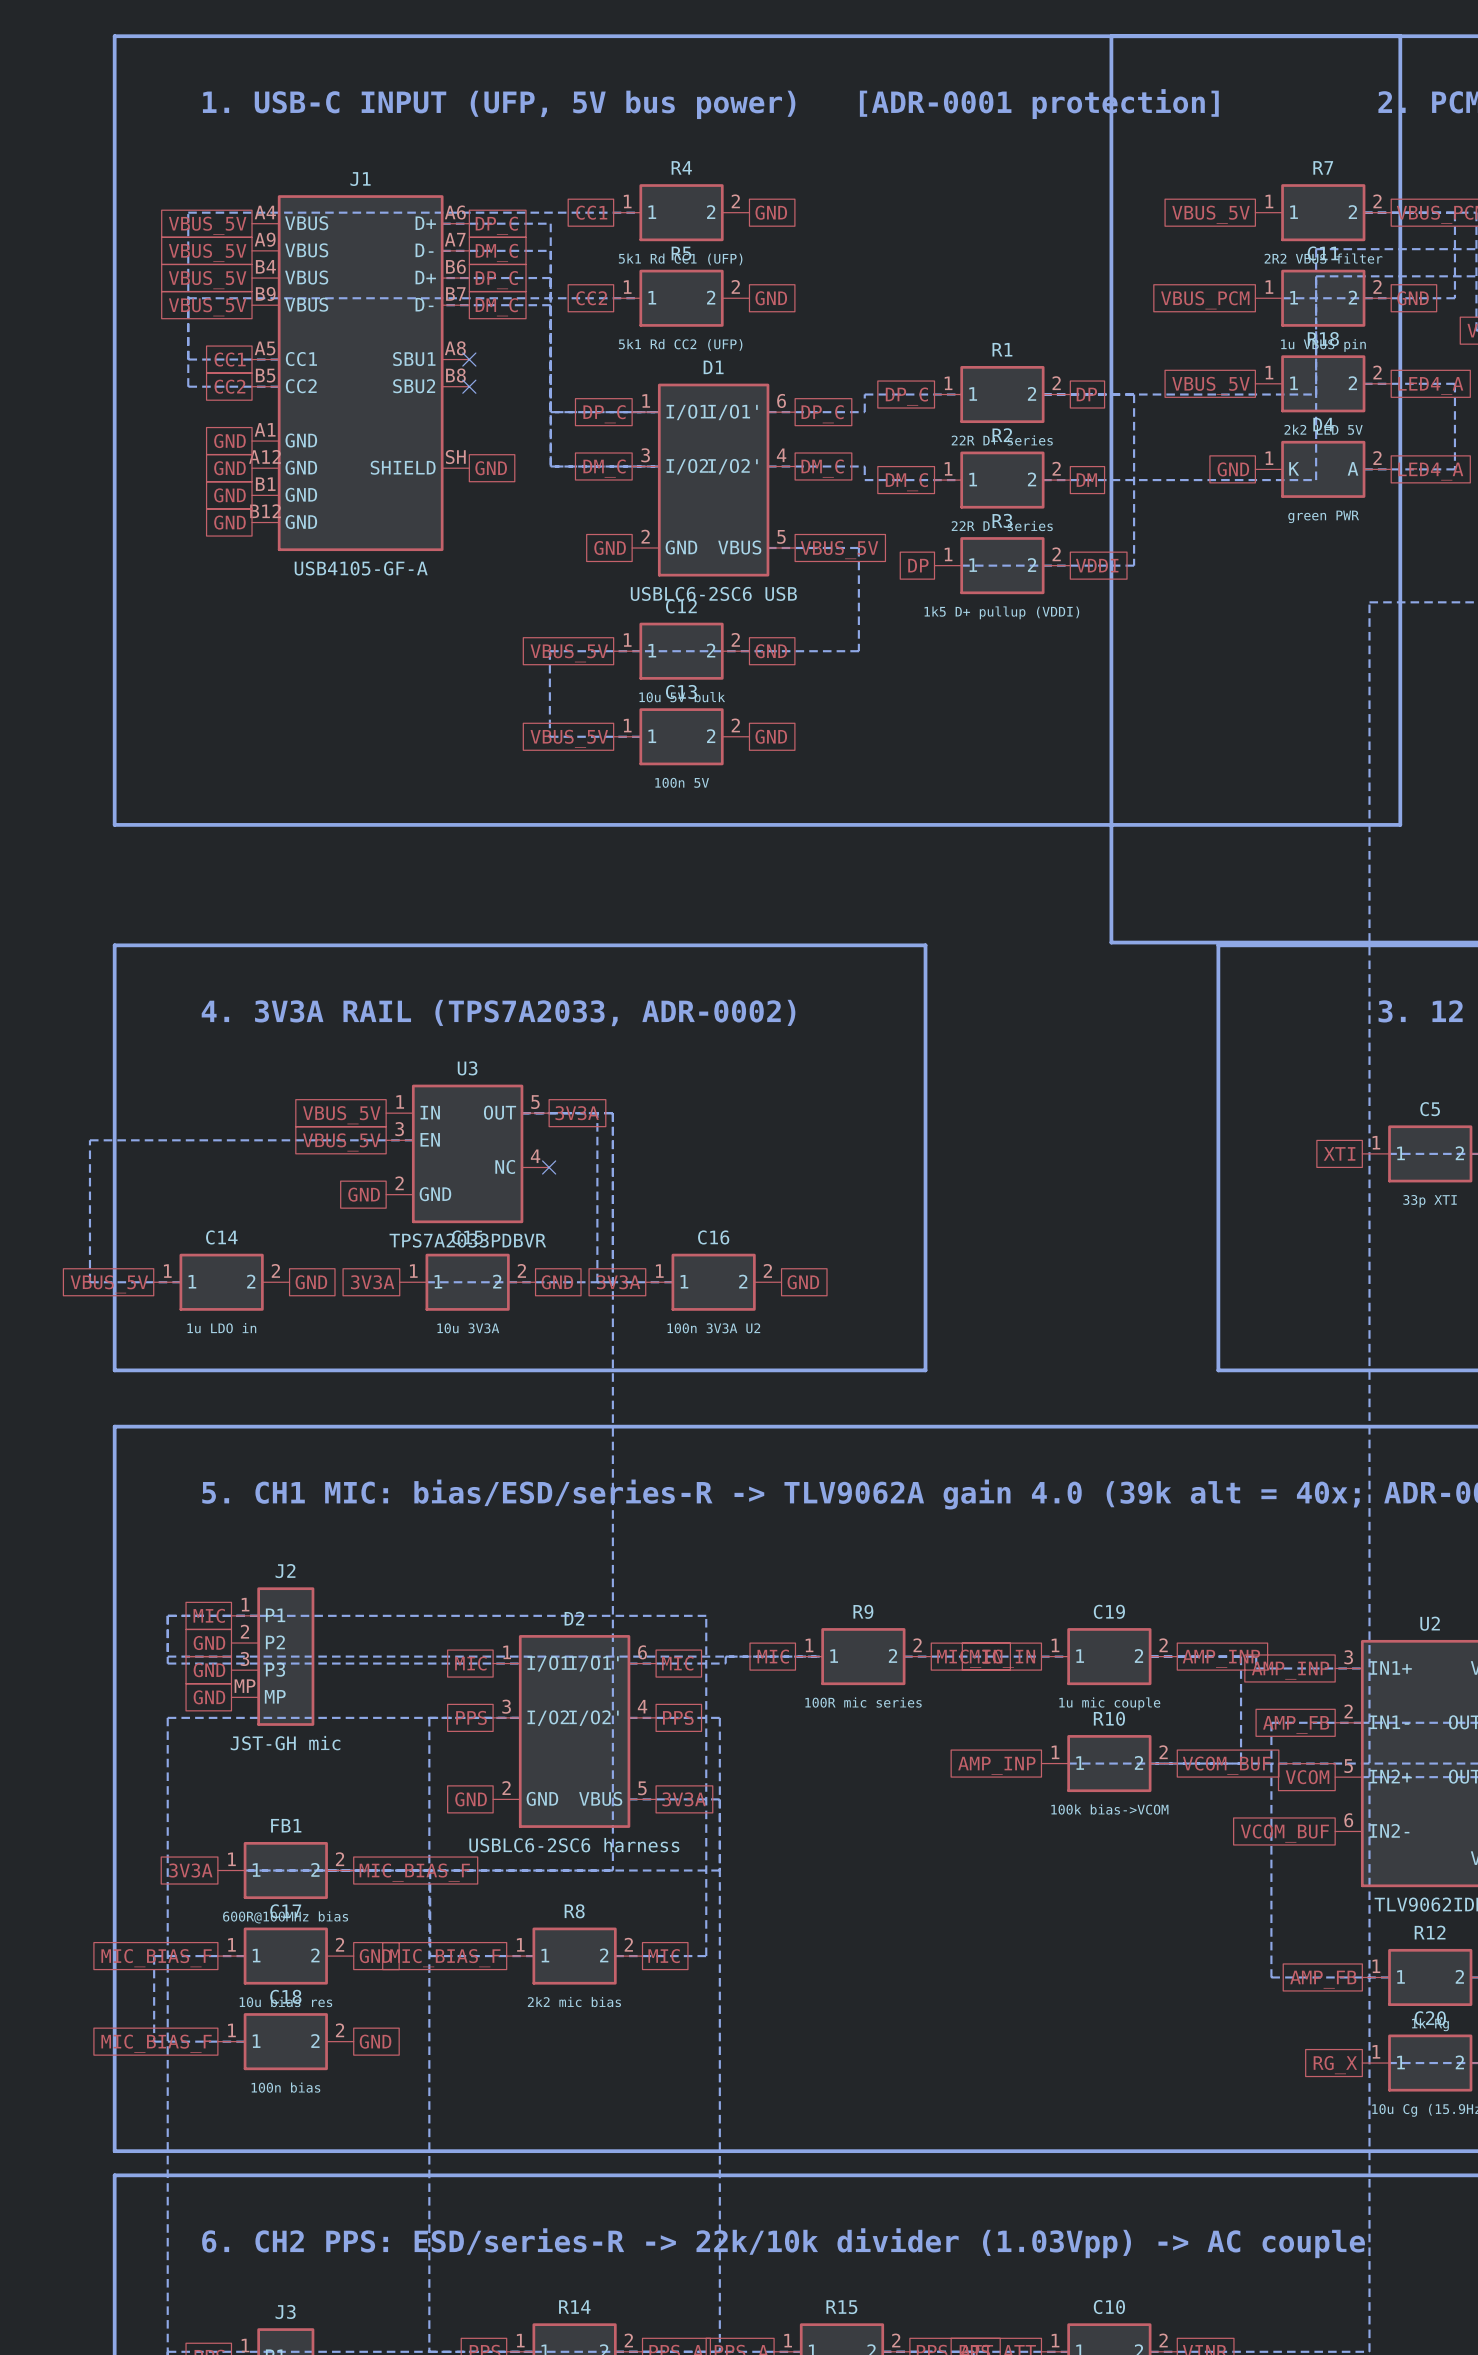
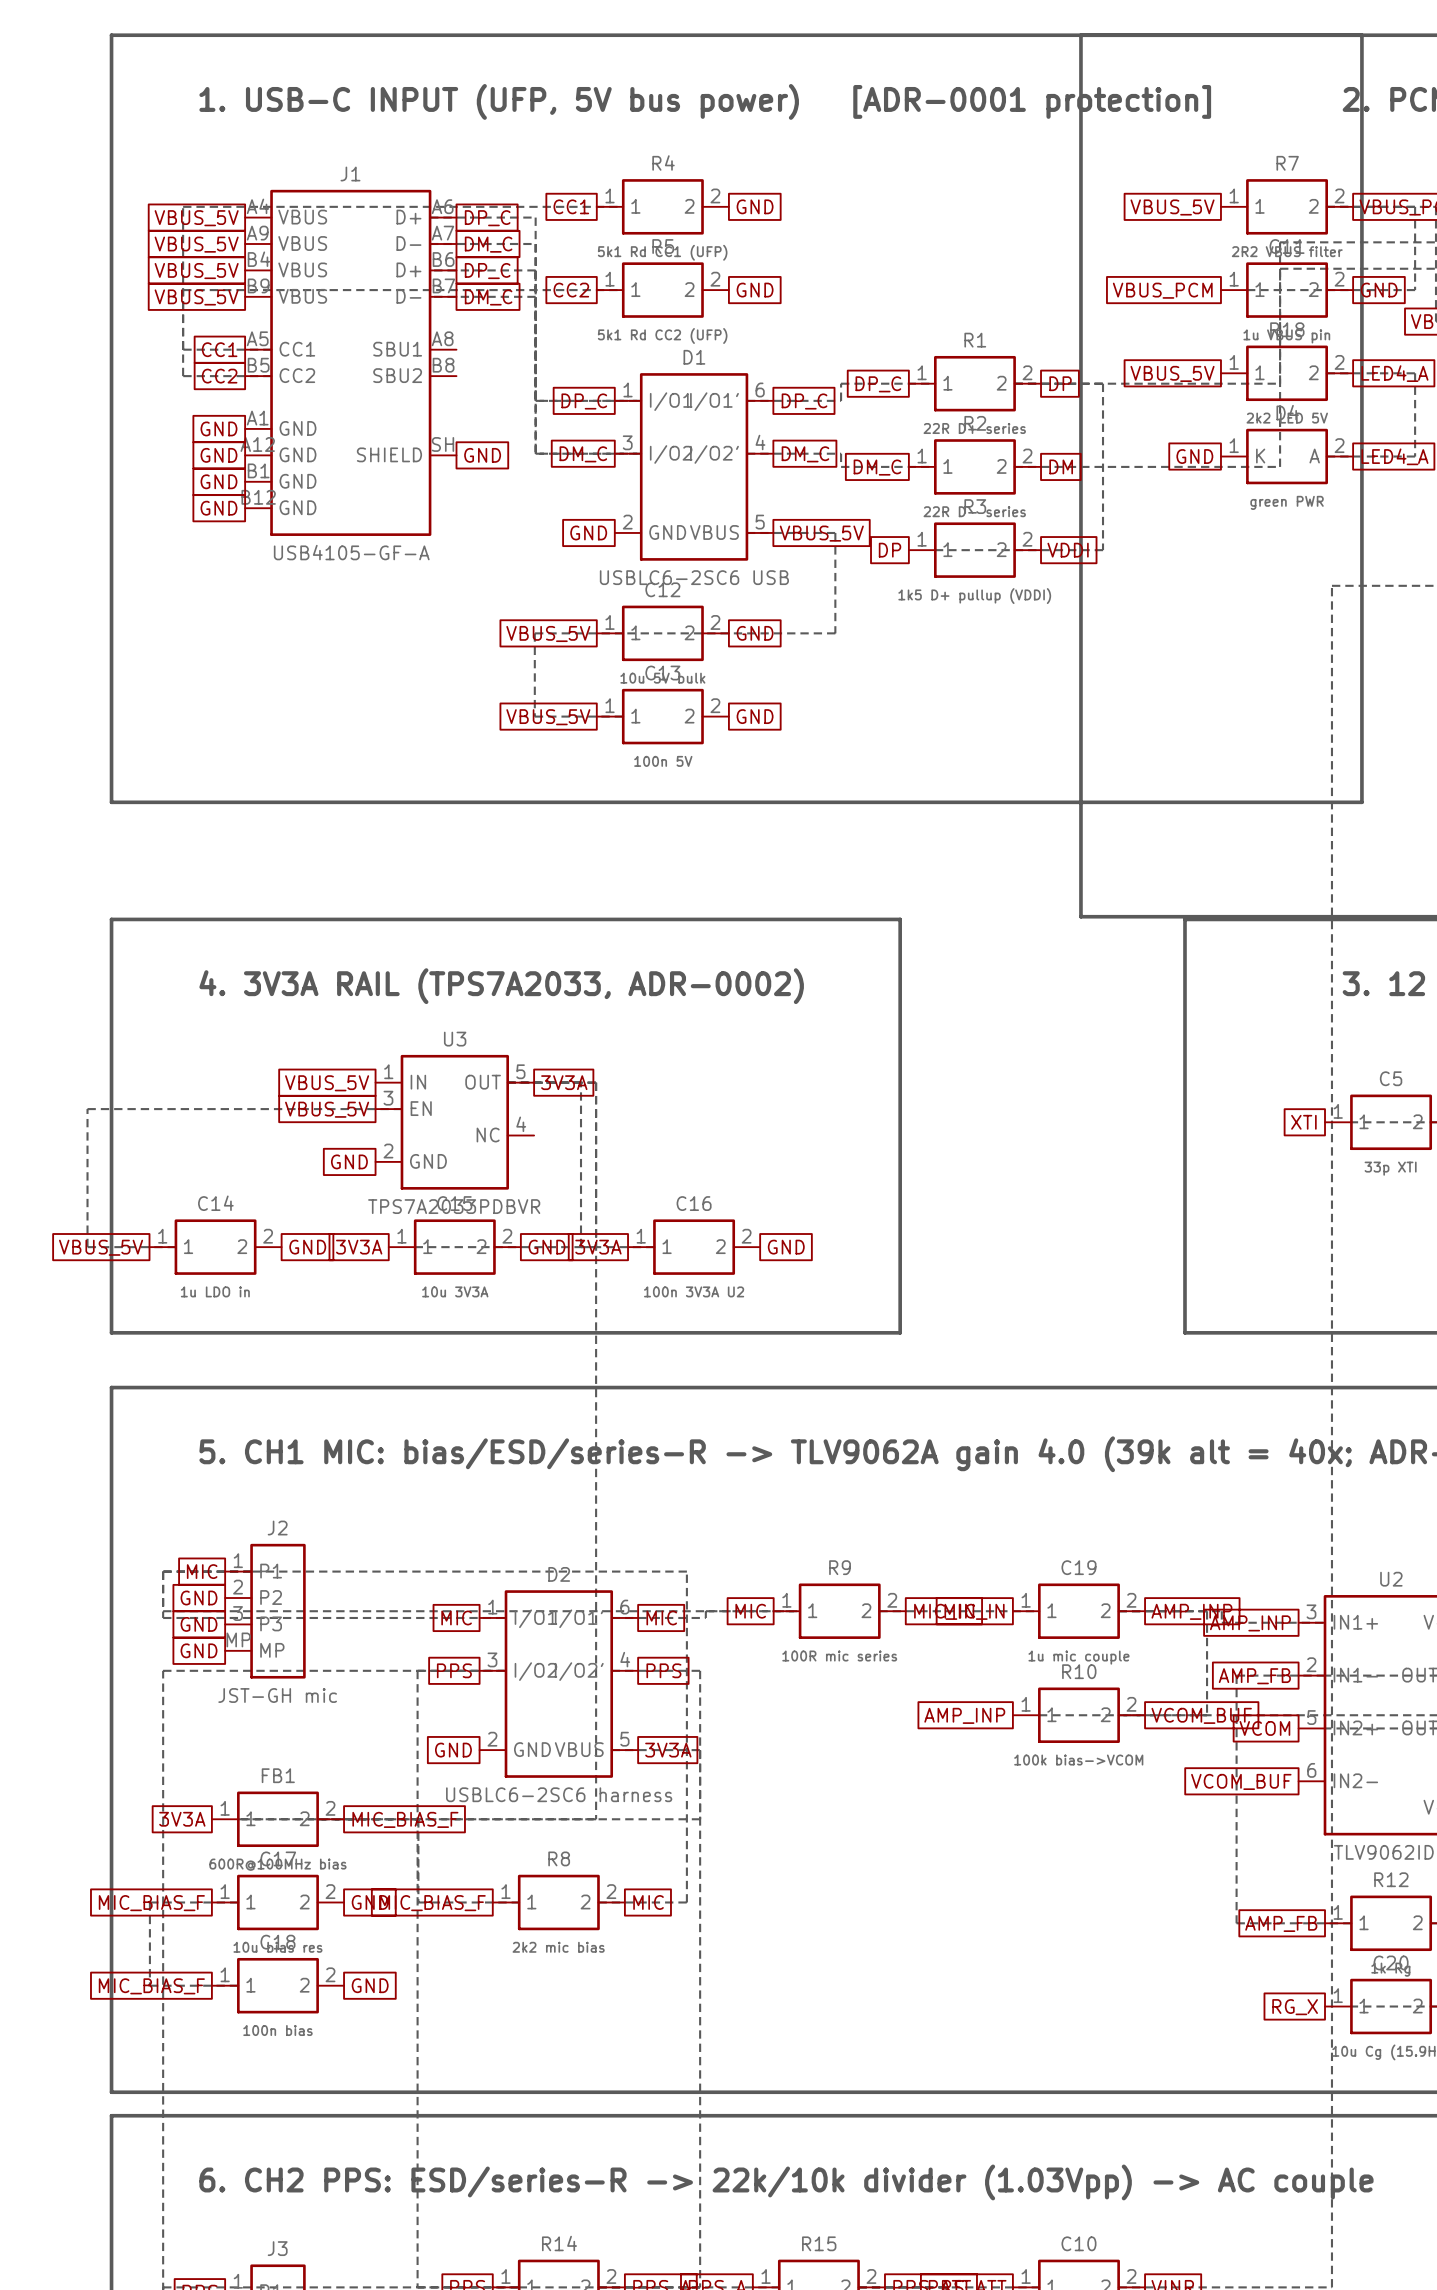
no-connect mark: (469, 359) -> none
no-connect mark: (469, 386) -> none
no-connect mark: (549, 1167) -> none

